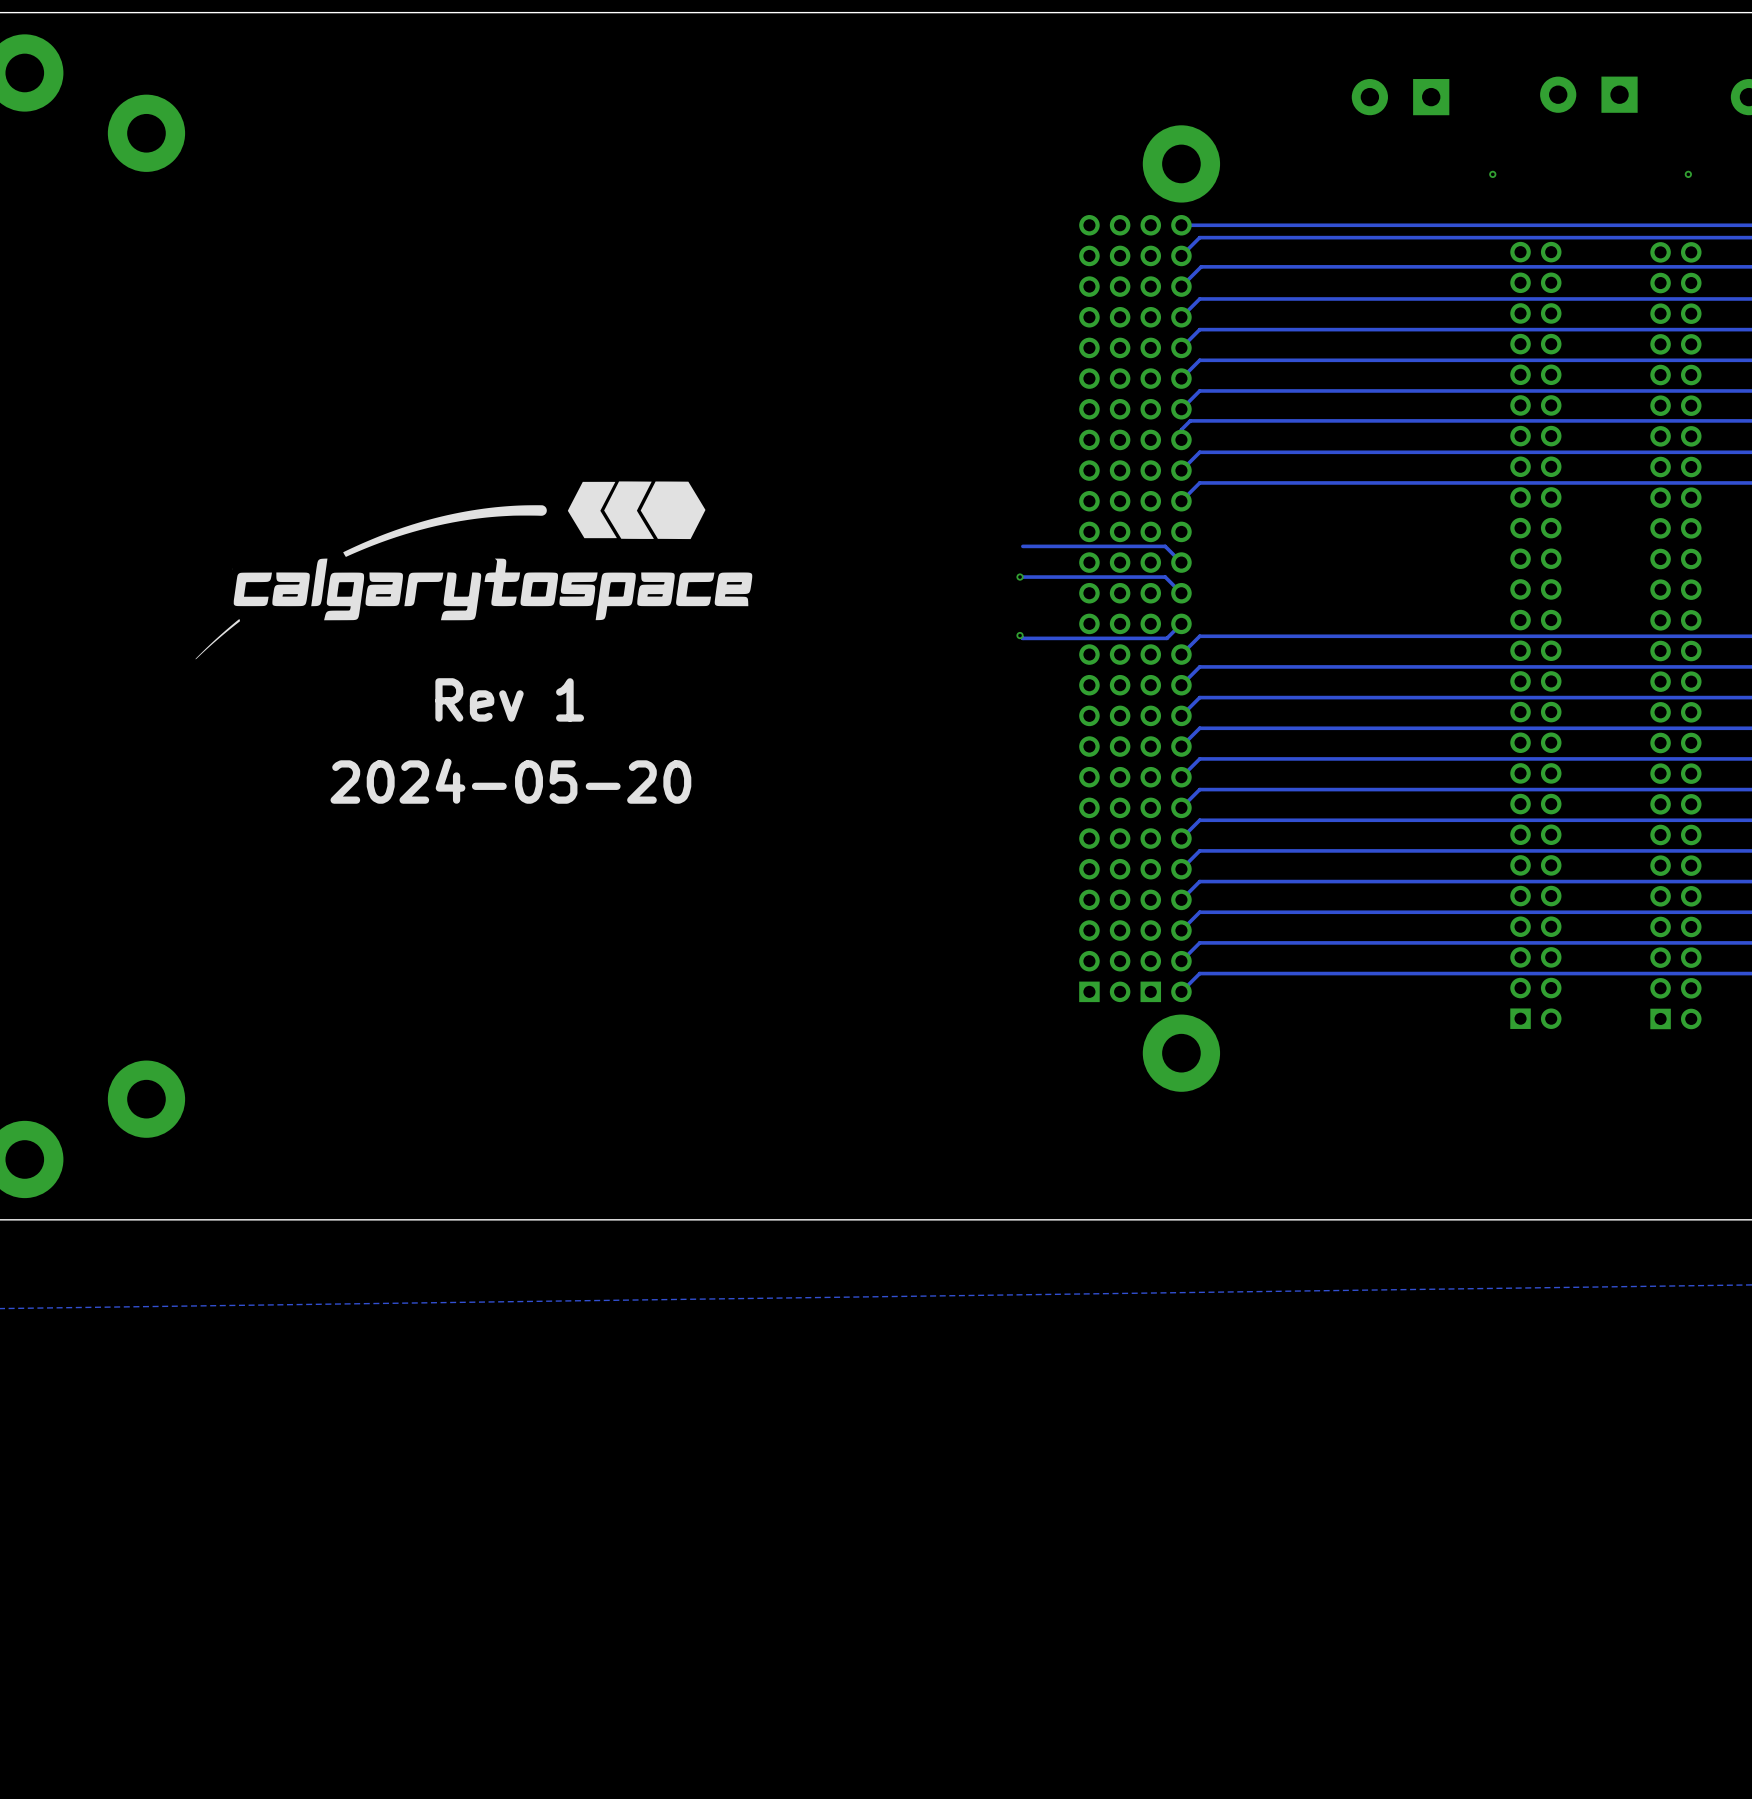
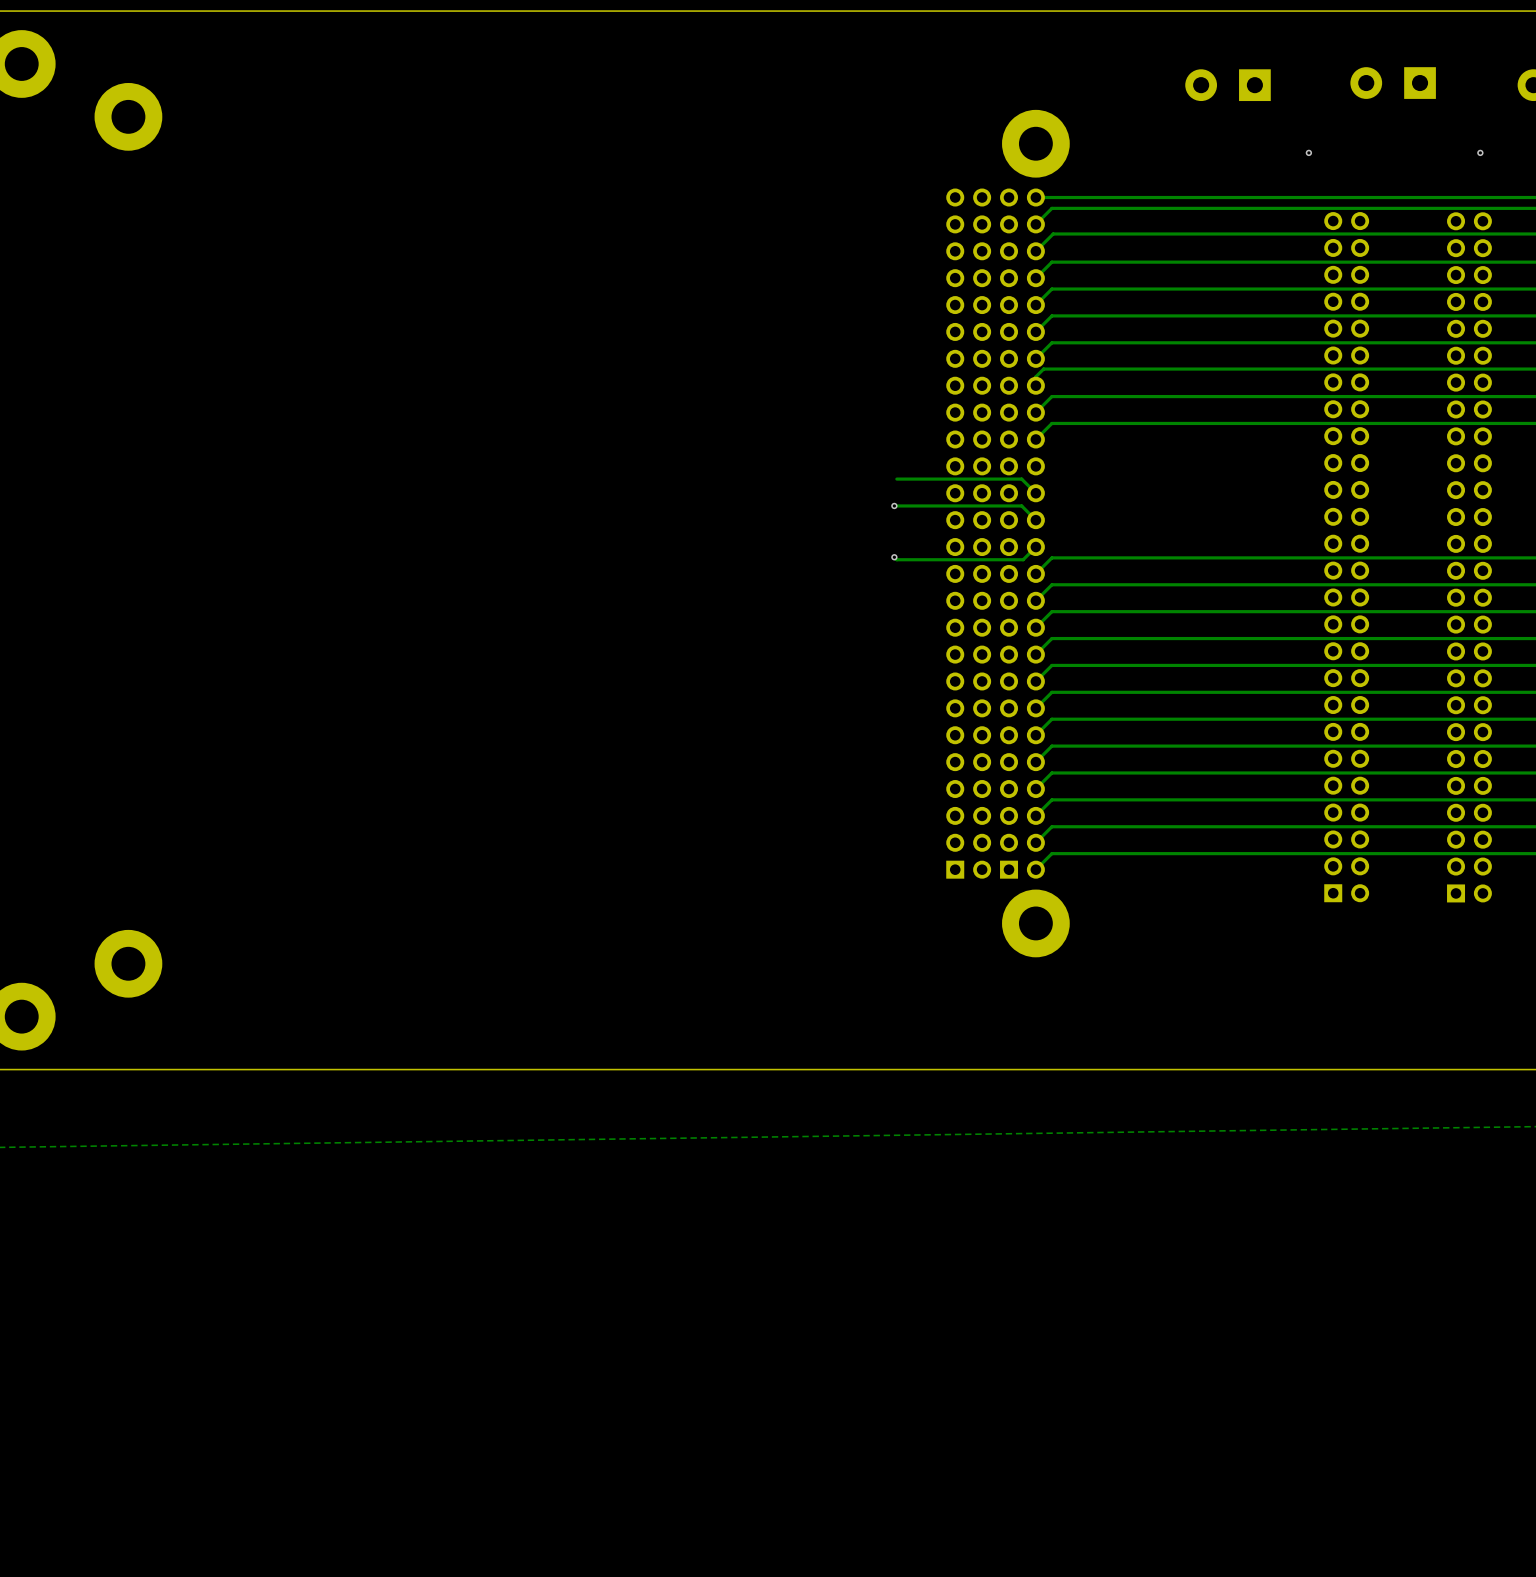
drawing: [195, 481, 753, 660] -> none
text: Rev 1 (509, 699) -> none
text: 2024-05-20 (510, 781) -> none

